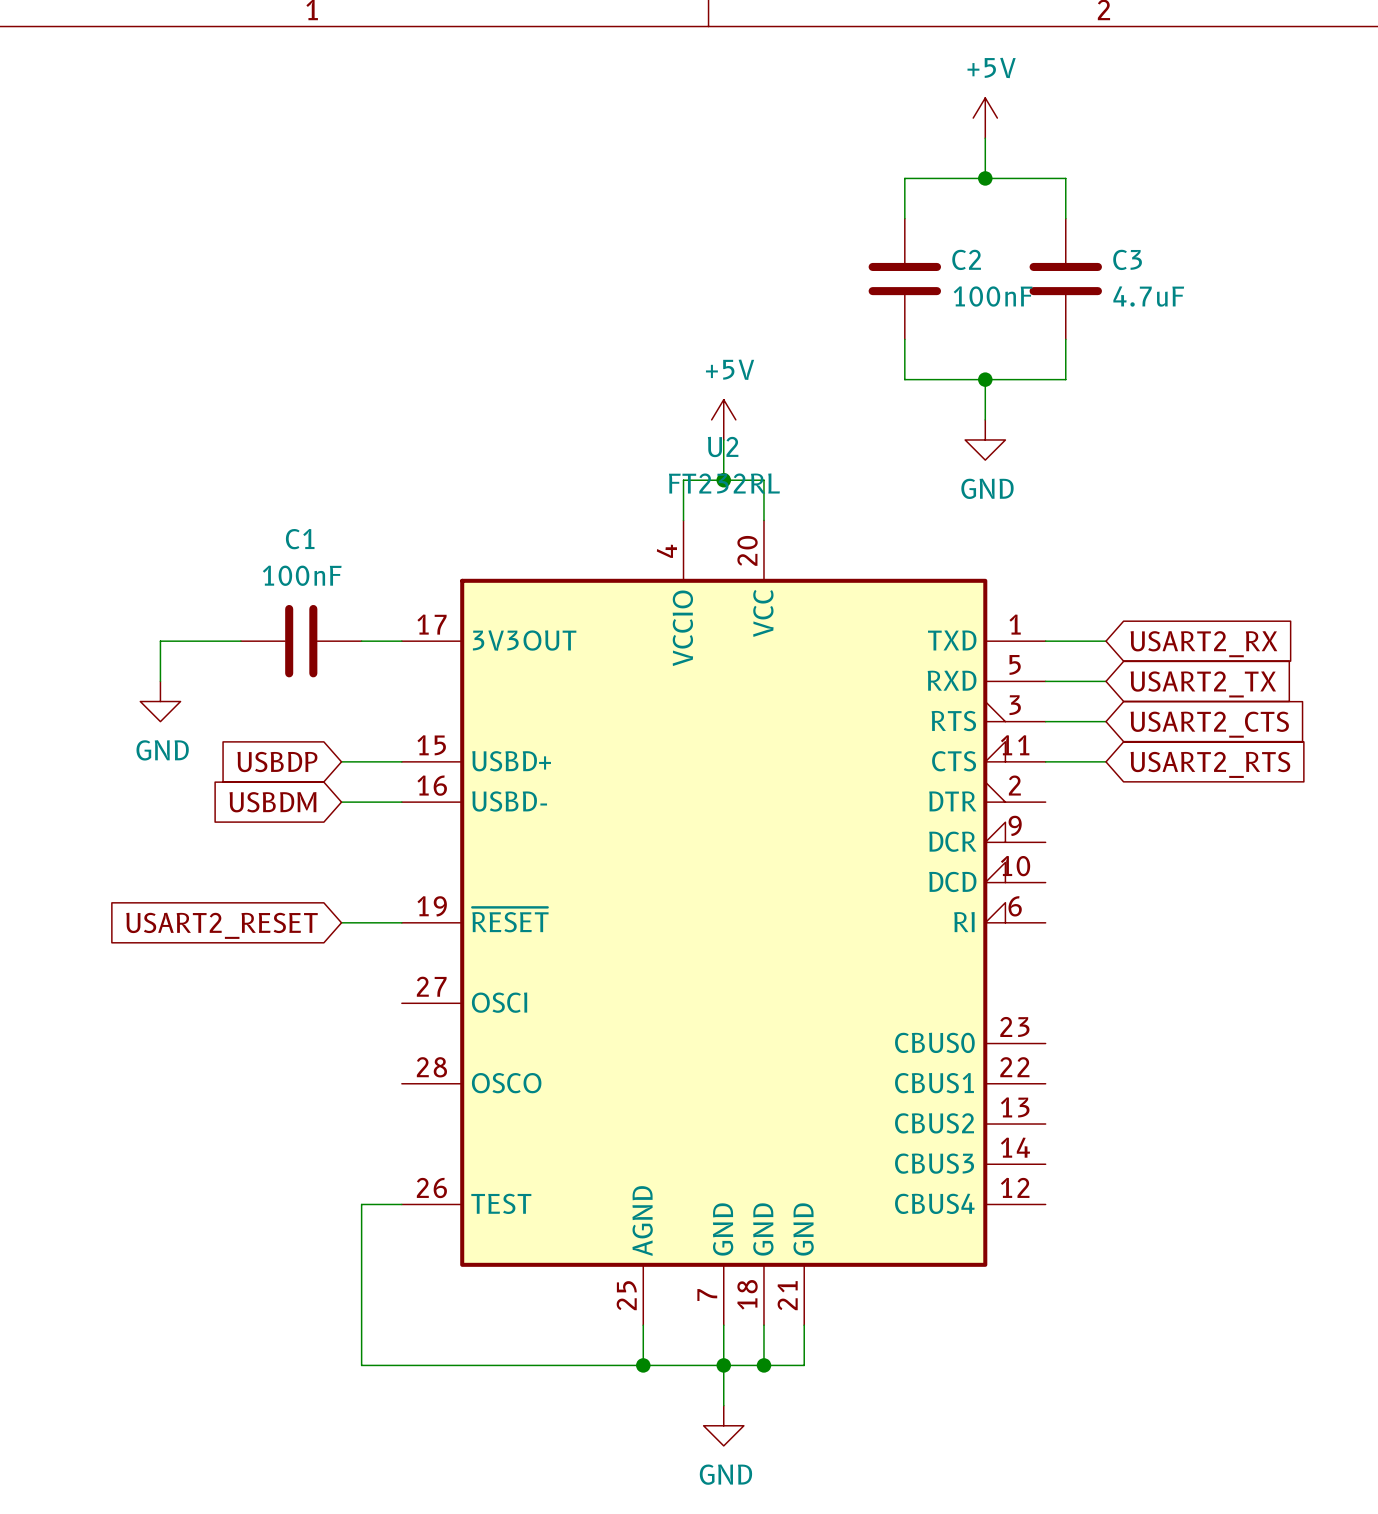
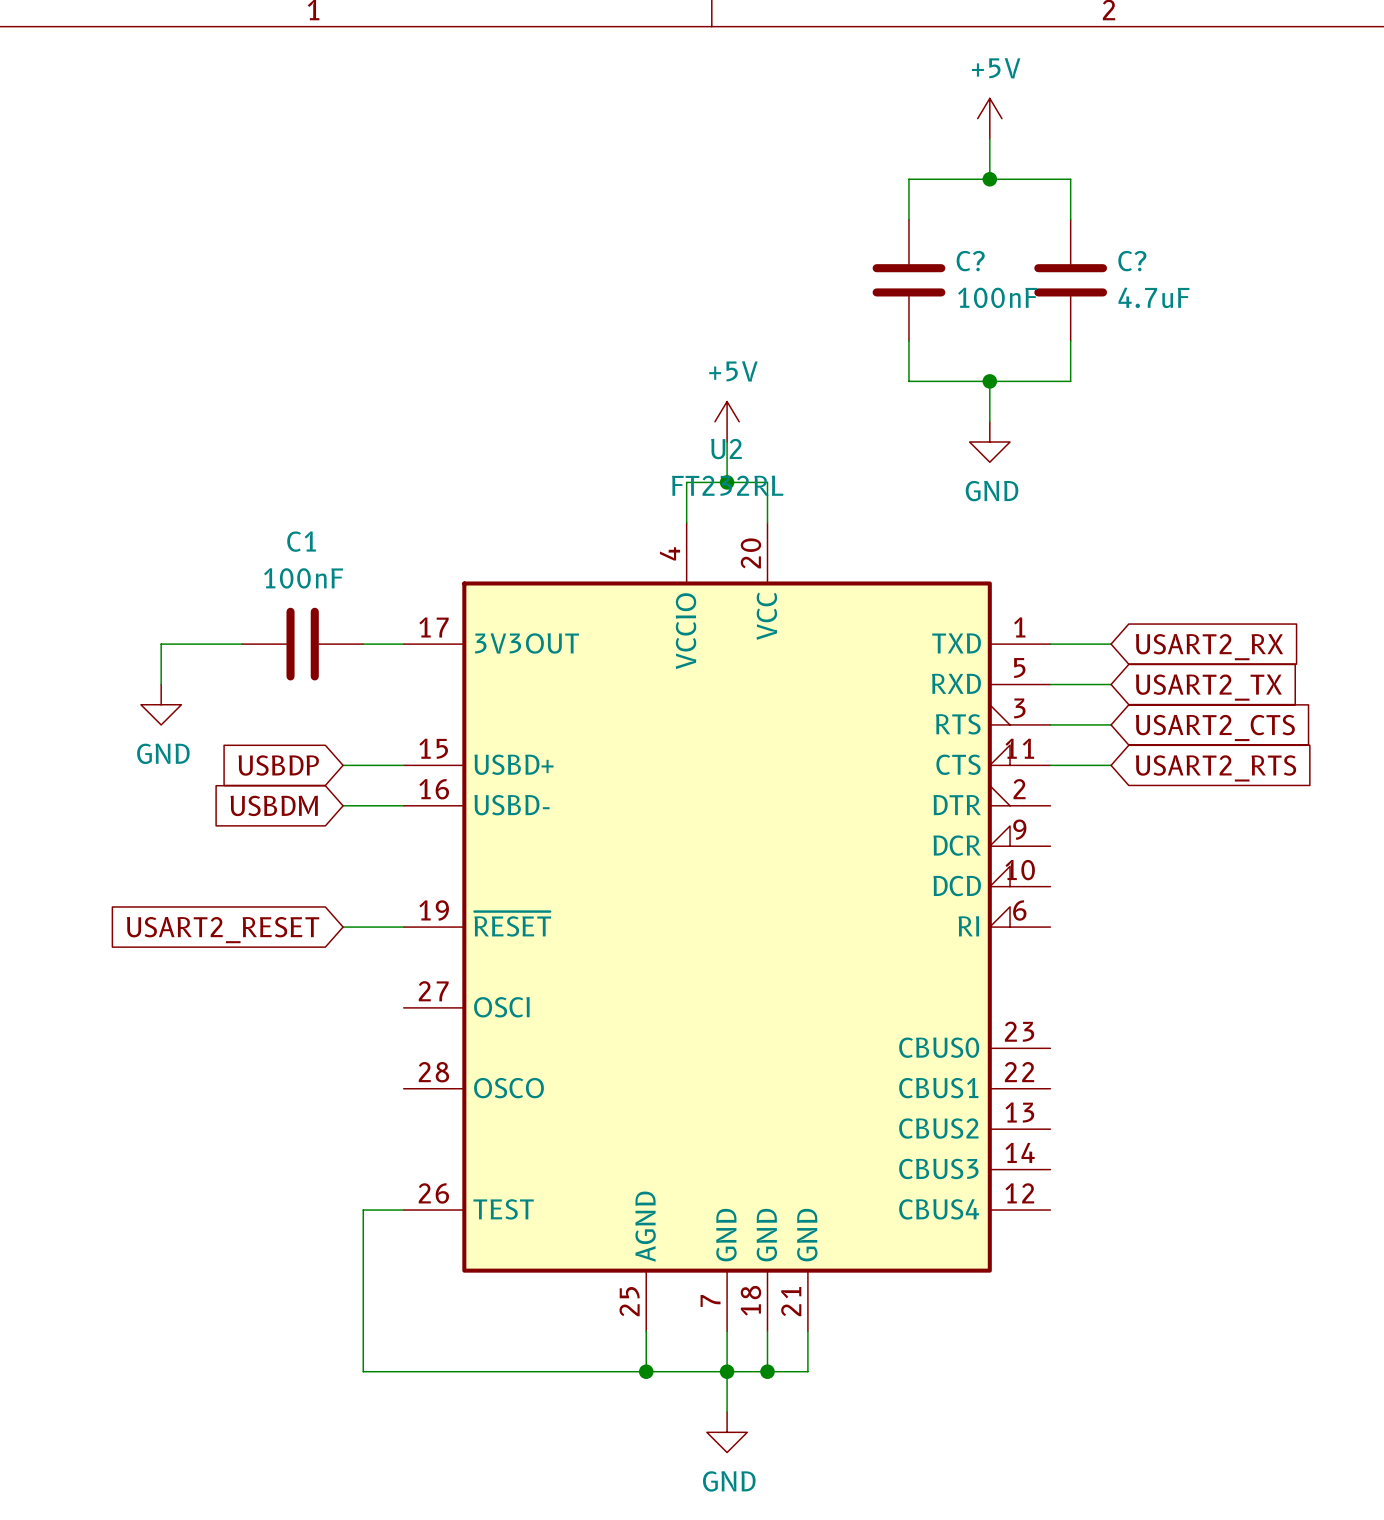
C2 name: C2 (966, 259) -> C? (970, 261)
C3 name: C3 (1127, 259) -> C? (1132, 261)

